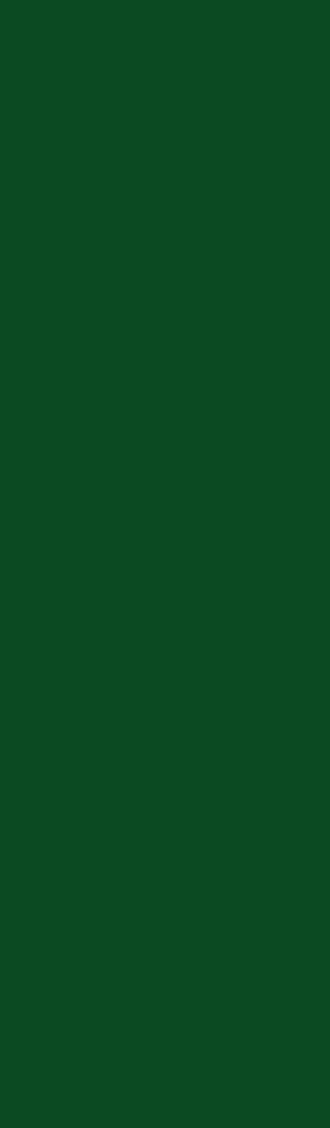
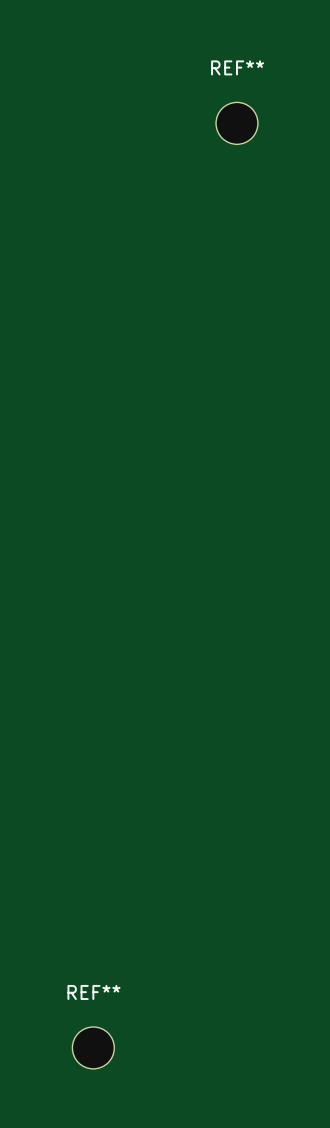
REF**: none -> (236, 123)
REF**: none -> (93, 1047)

